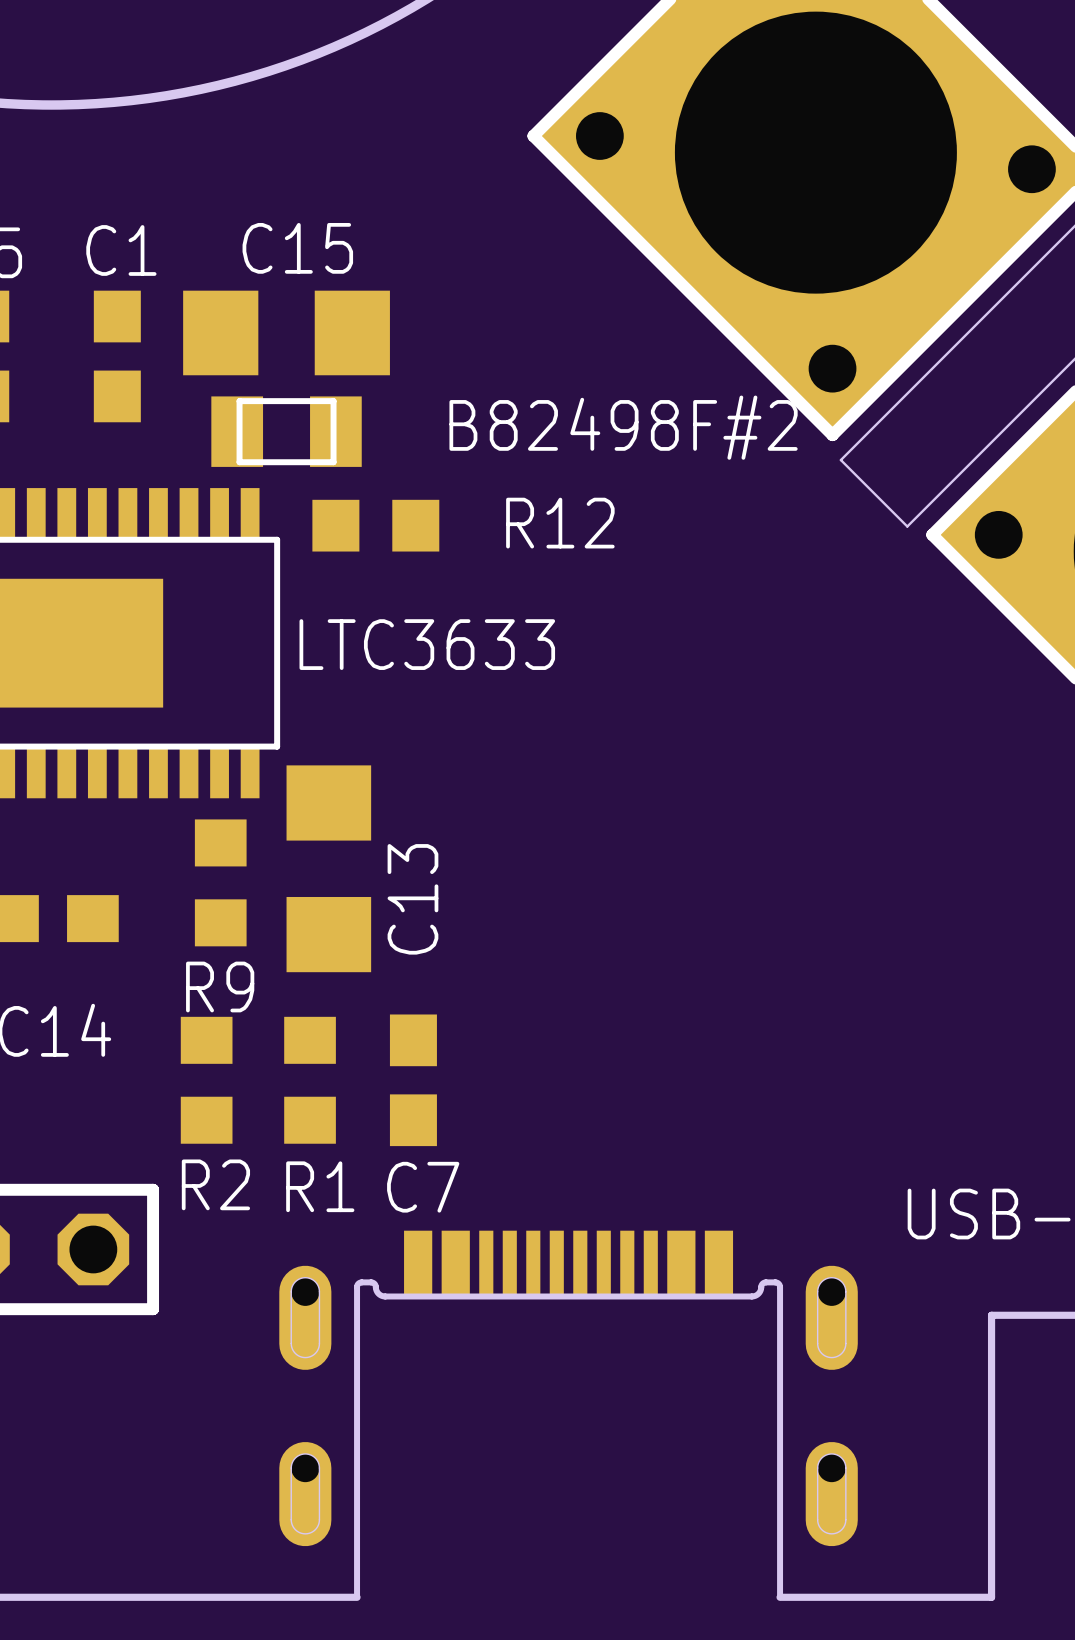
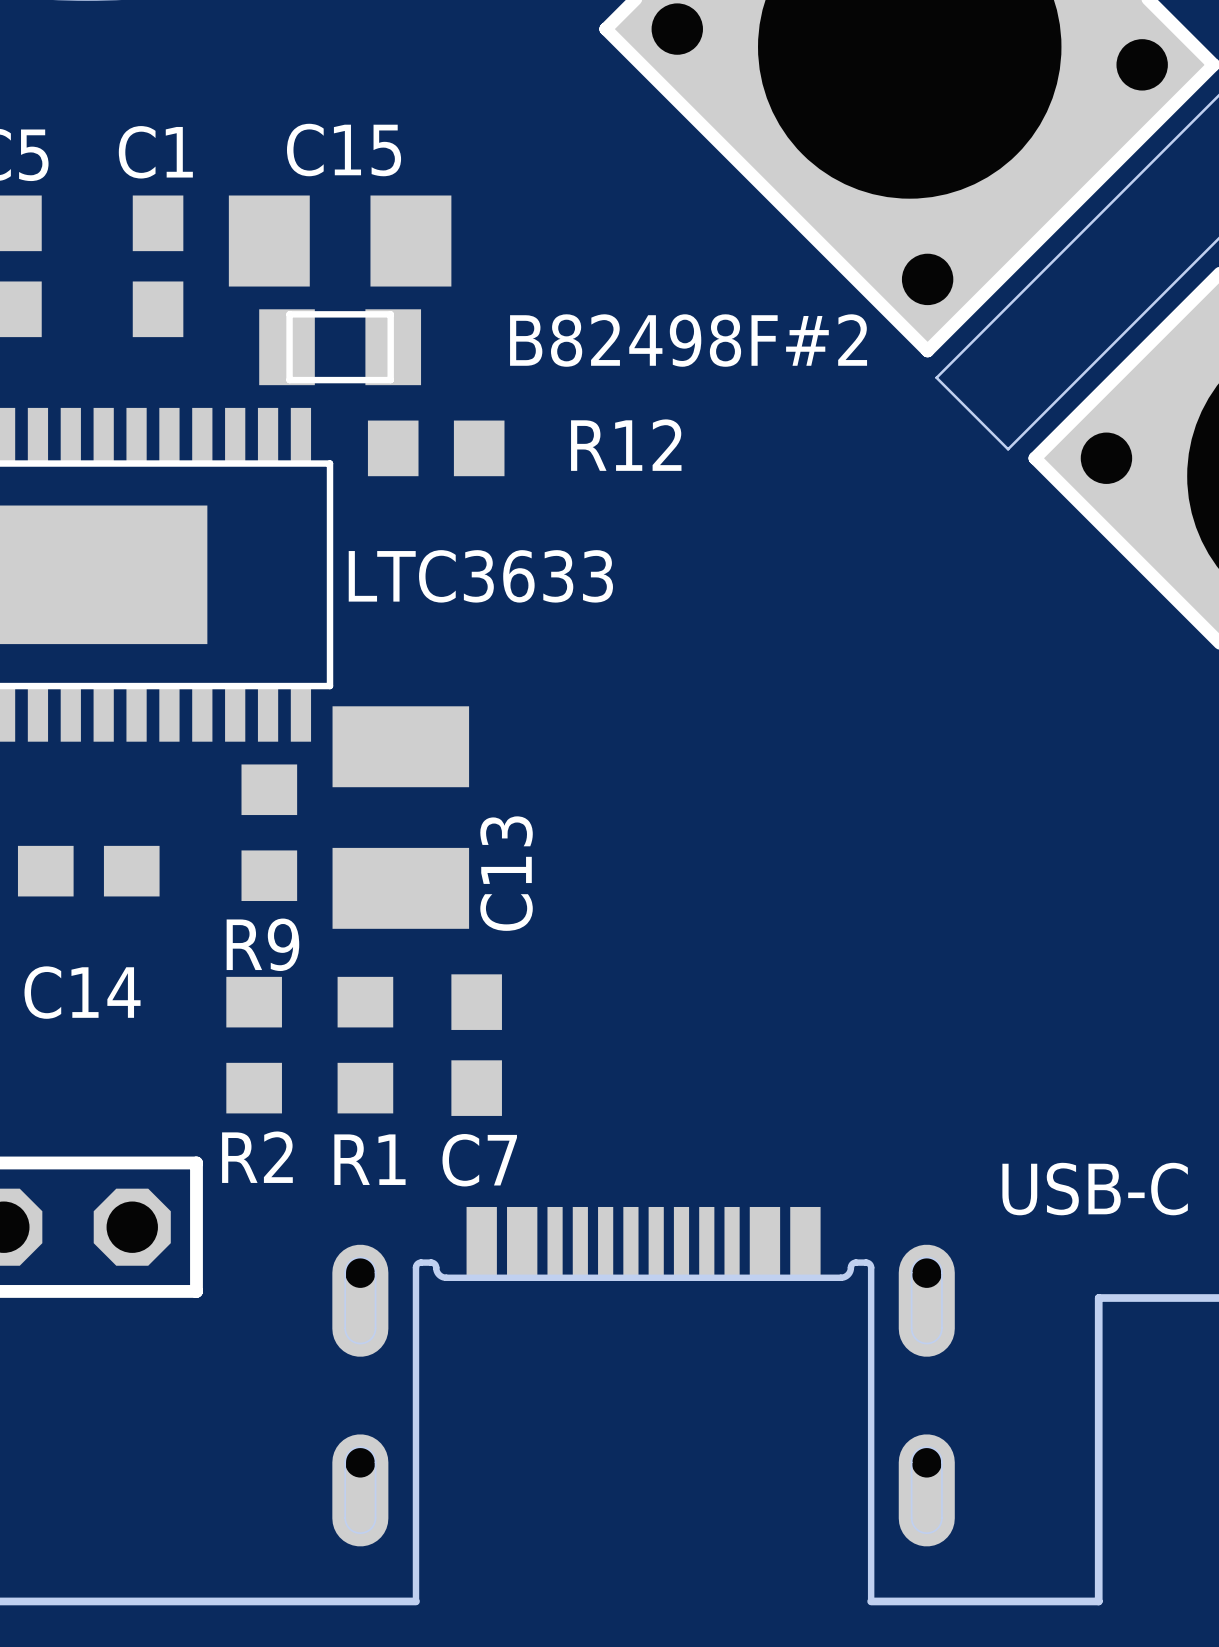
C13 footprint: [286, 765, 372, 973] -> [332, 706, 470, 929]
C13 name position: C13 (412, 899) -> C13 (506, 873)

